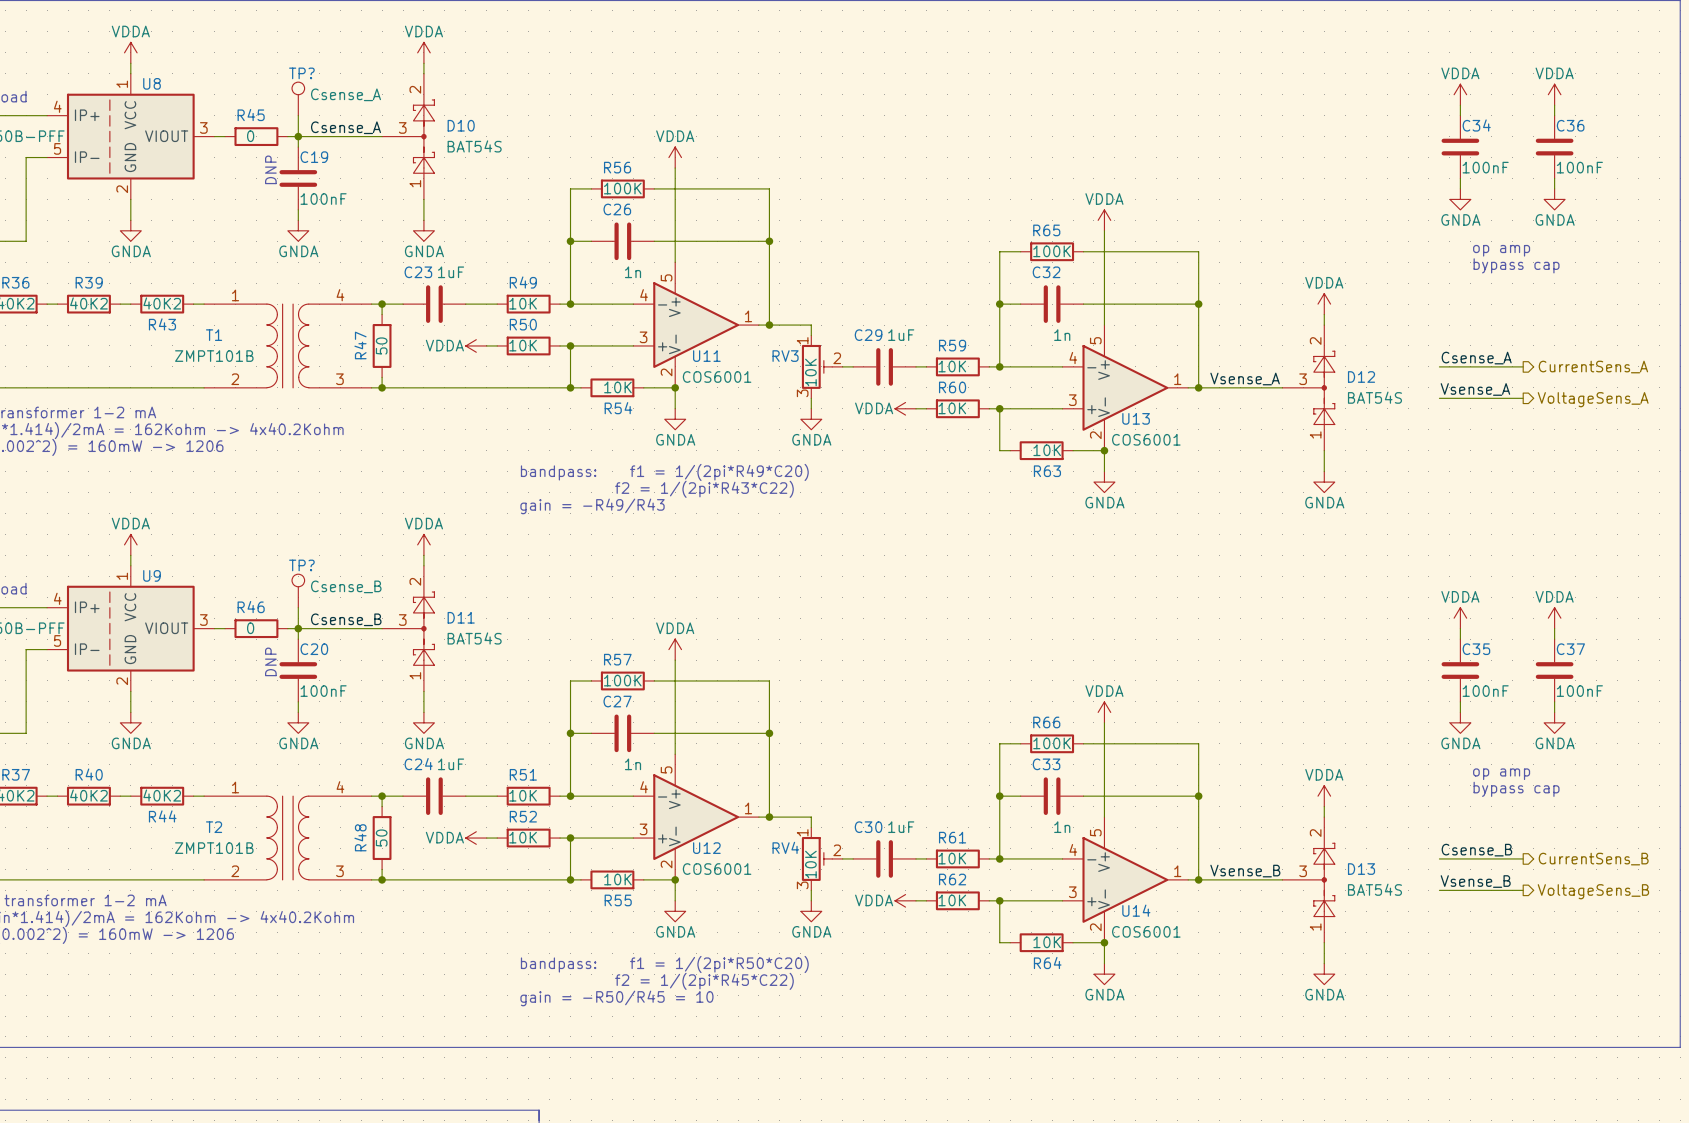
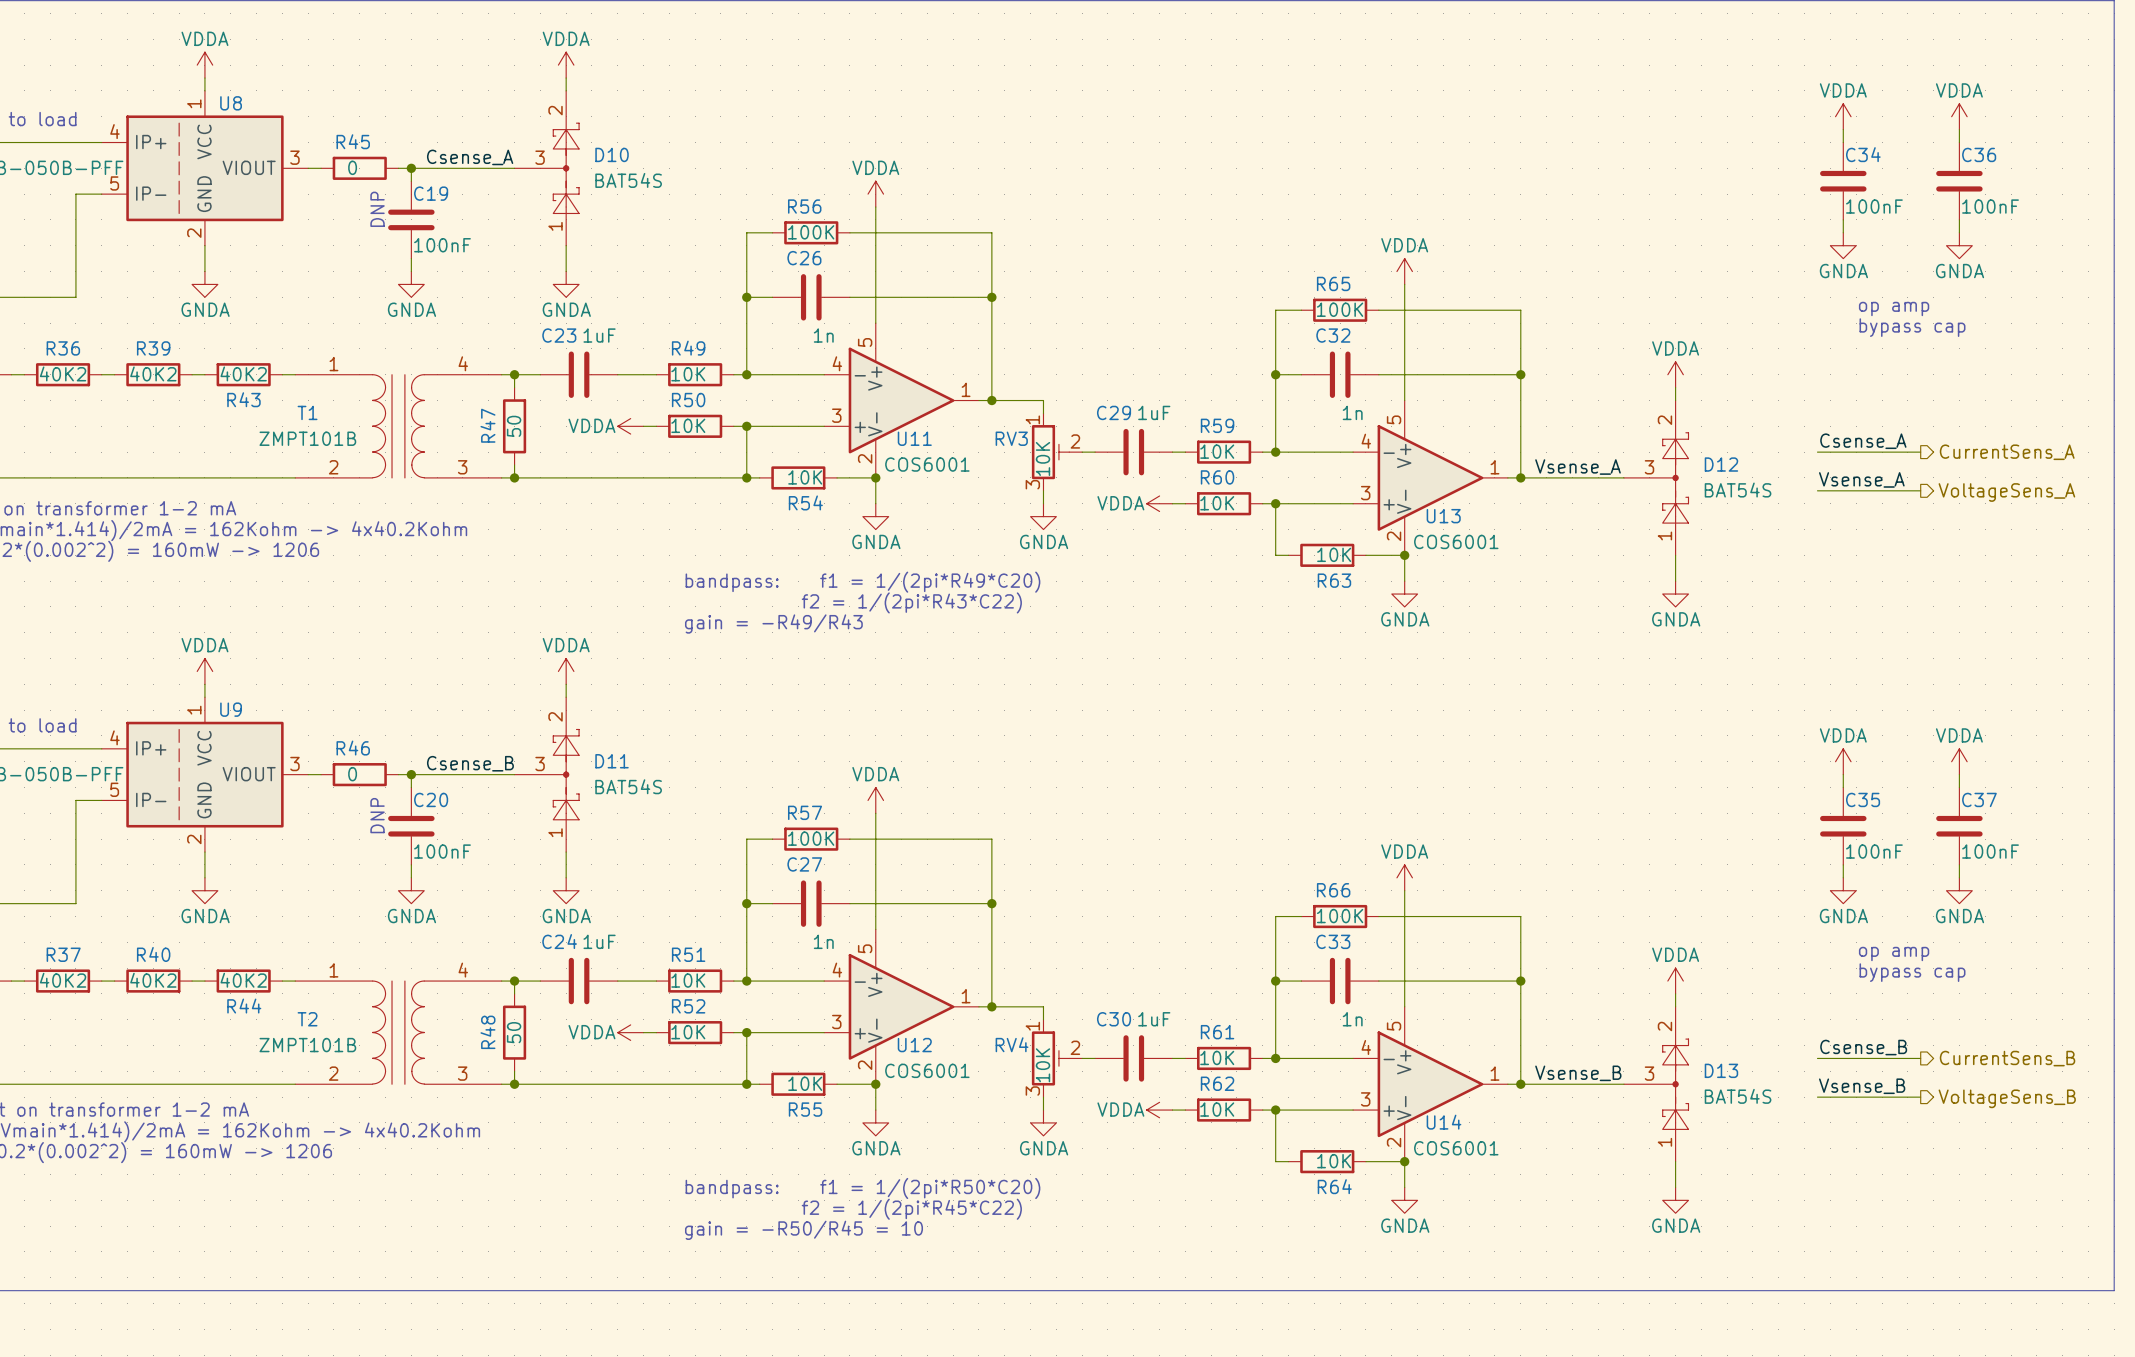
TP?: Csense_A (298, 98) -> none
wire: (298, 115) (298, 136) -> none
TP?: Csense_B (298, 590) -> none
wire: (298, 607) (298, 628) -> none

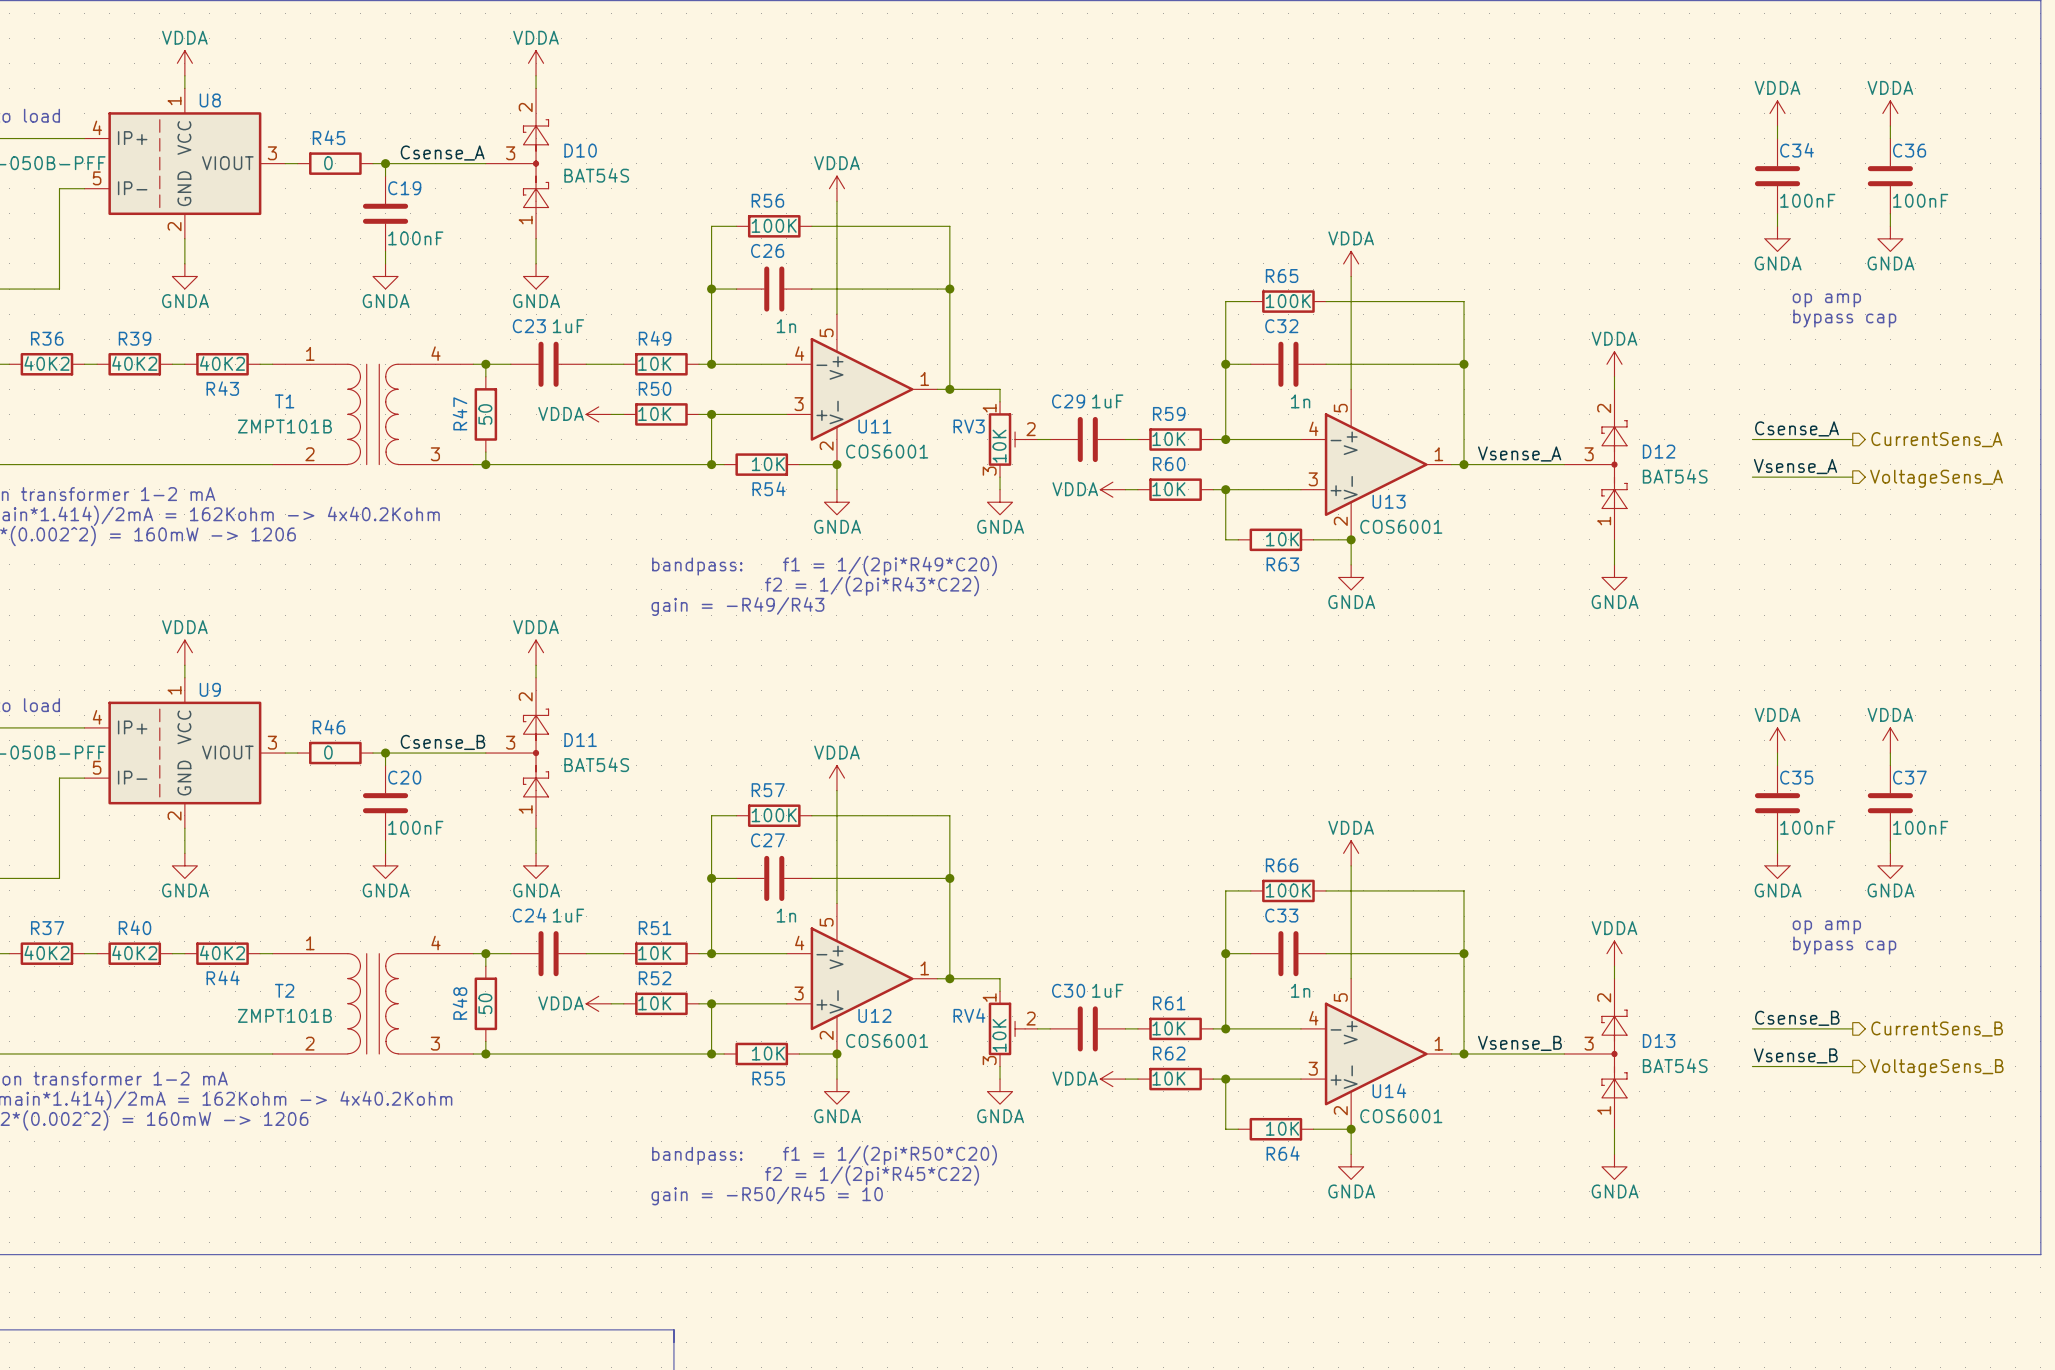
text: DNP (377, 209) -> none
text: DNP (377, 815) -> none

